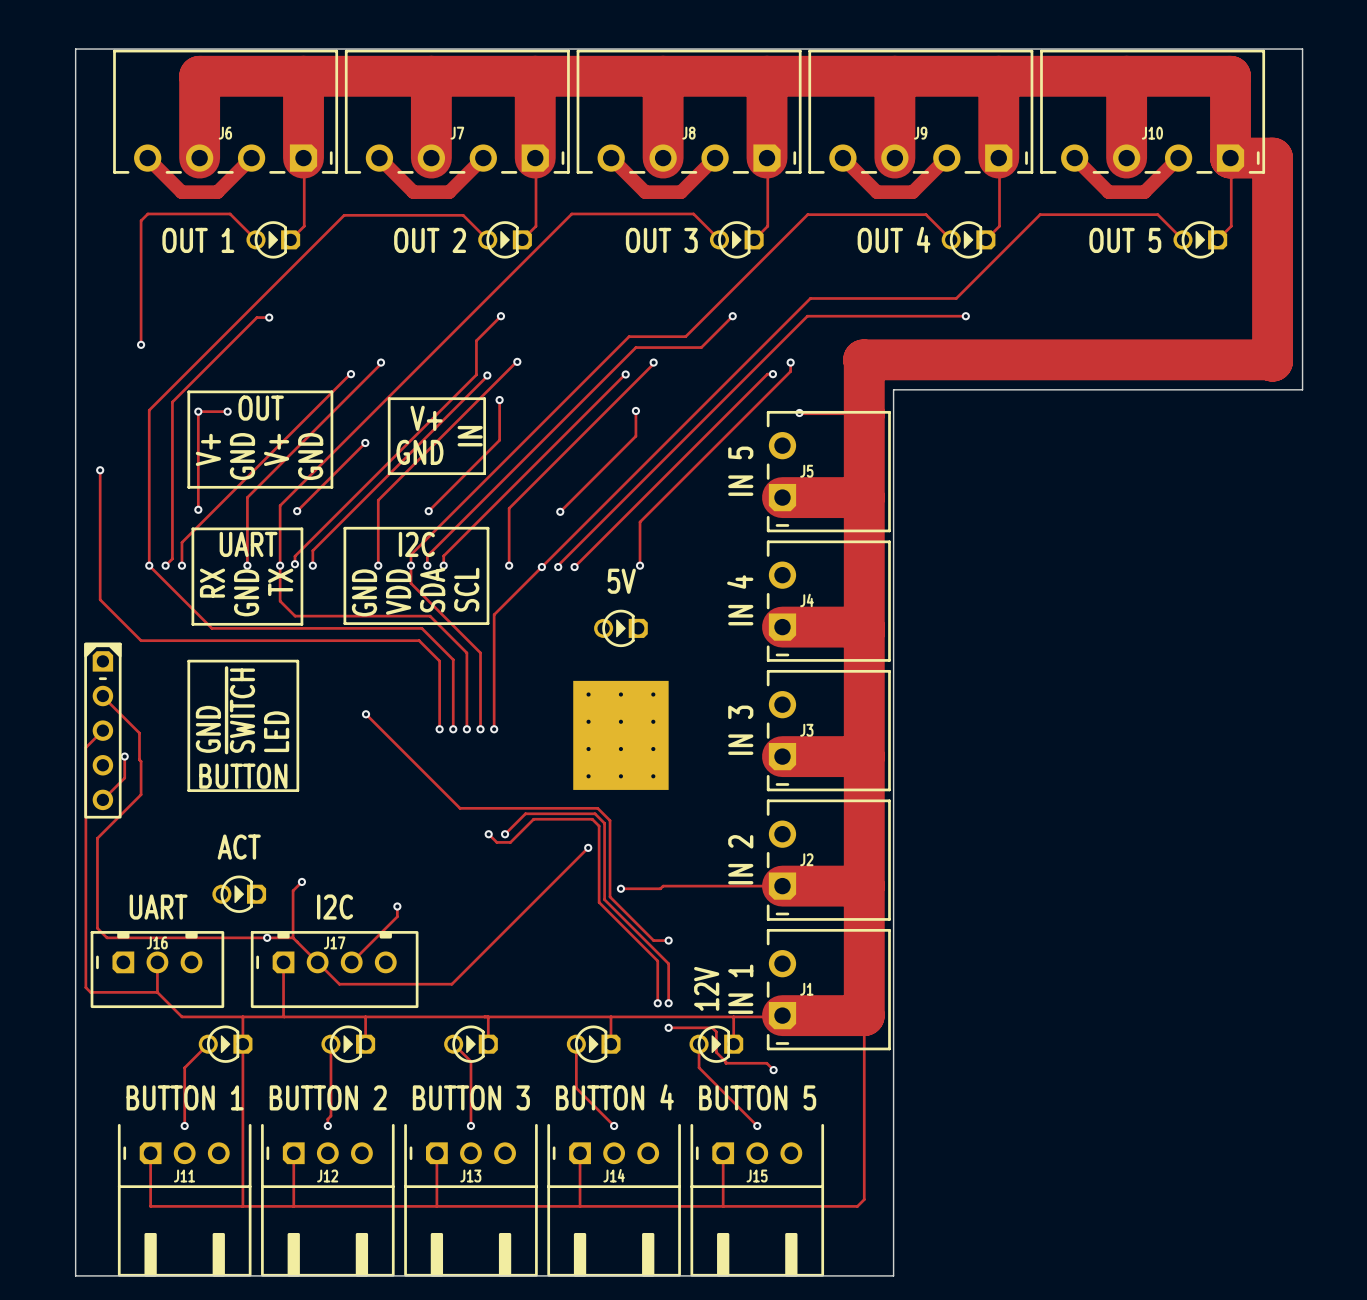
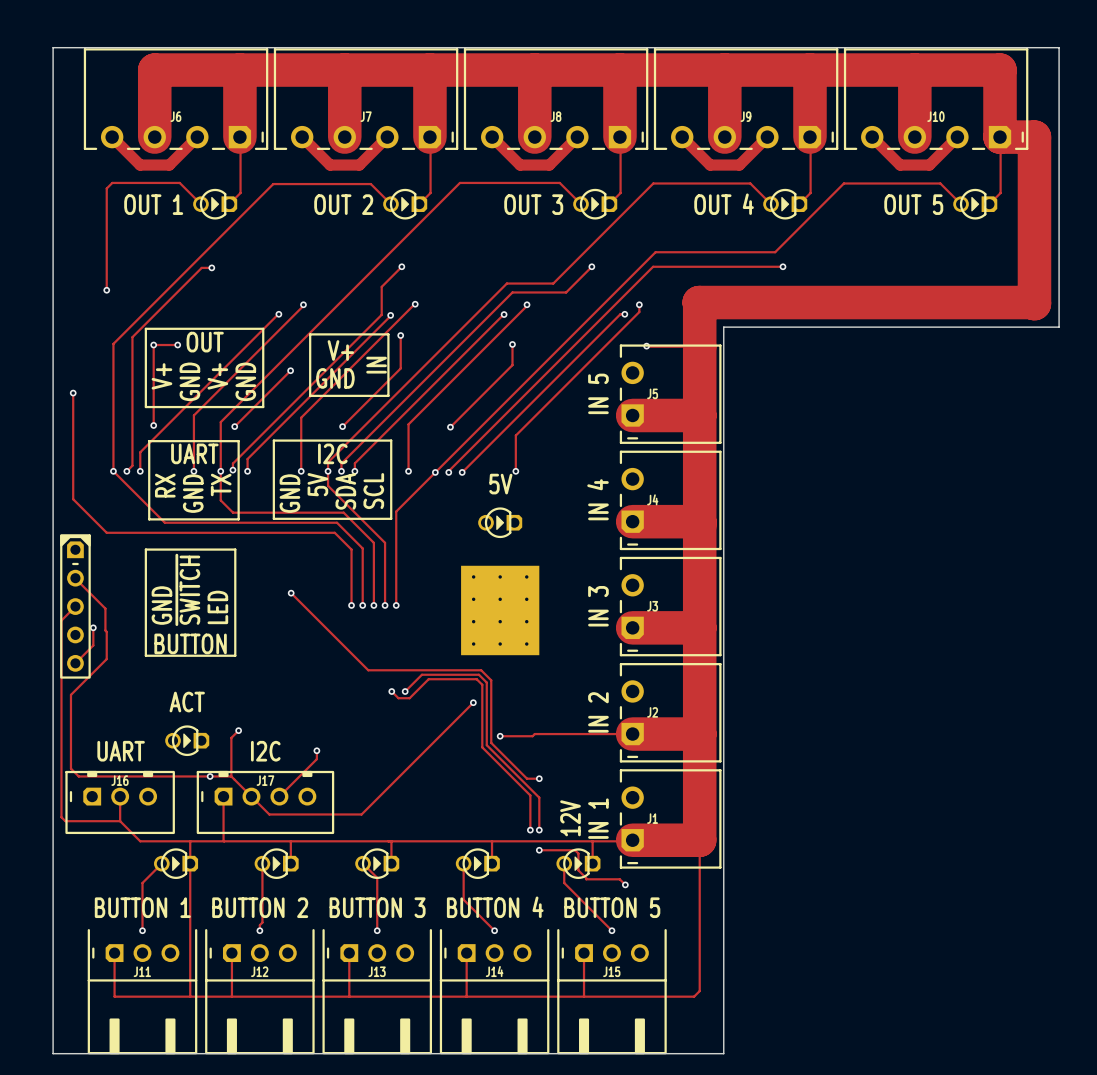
text: VDD (398, 592) -> 5V (317, 484)

